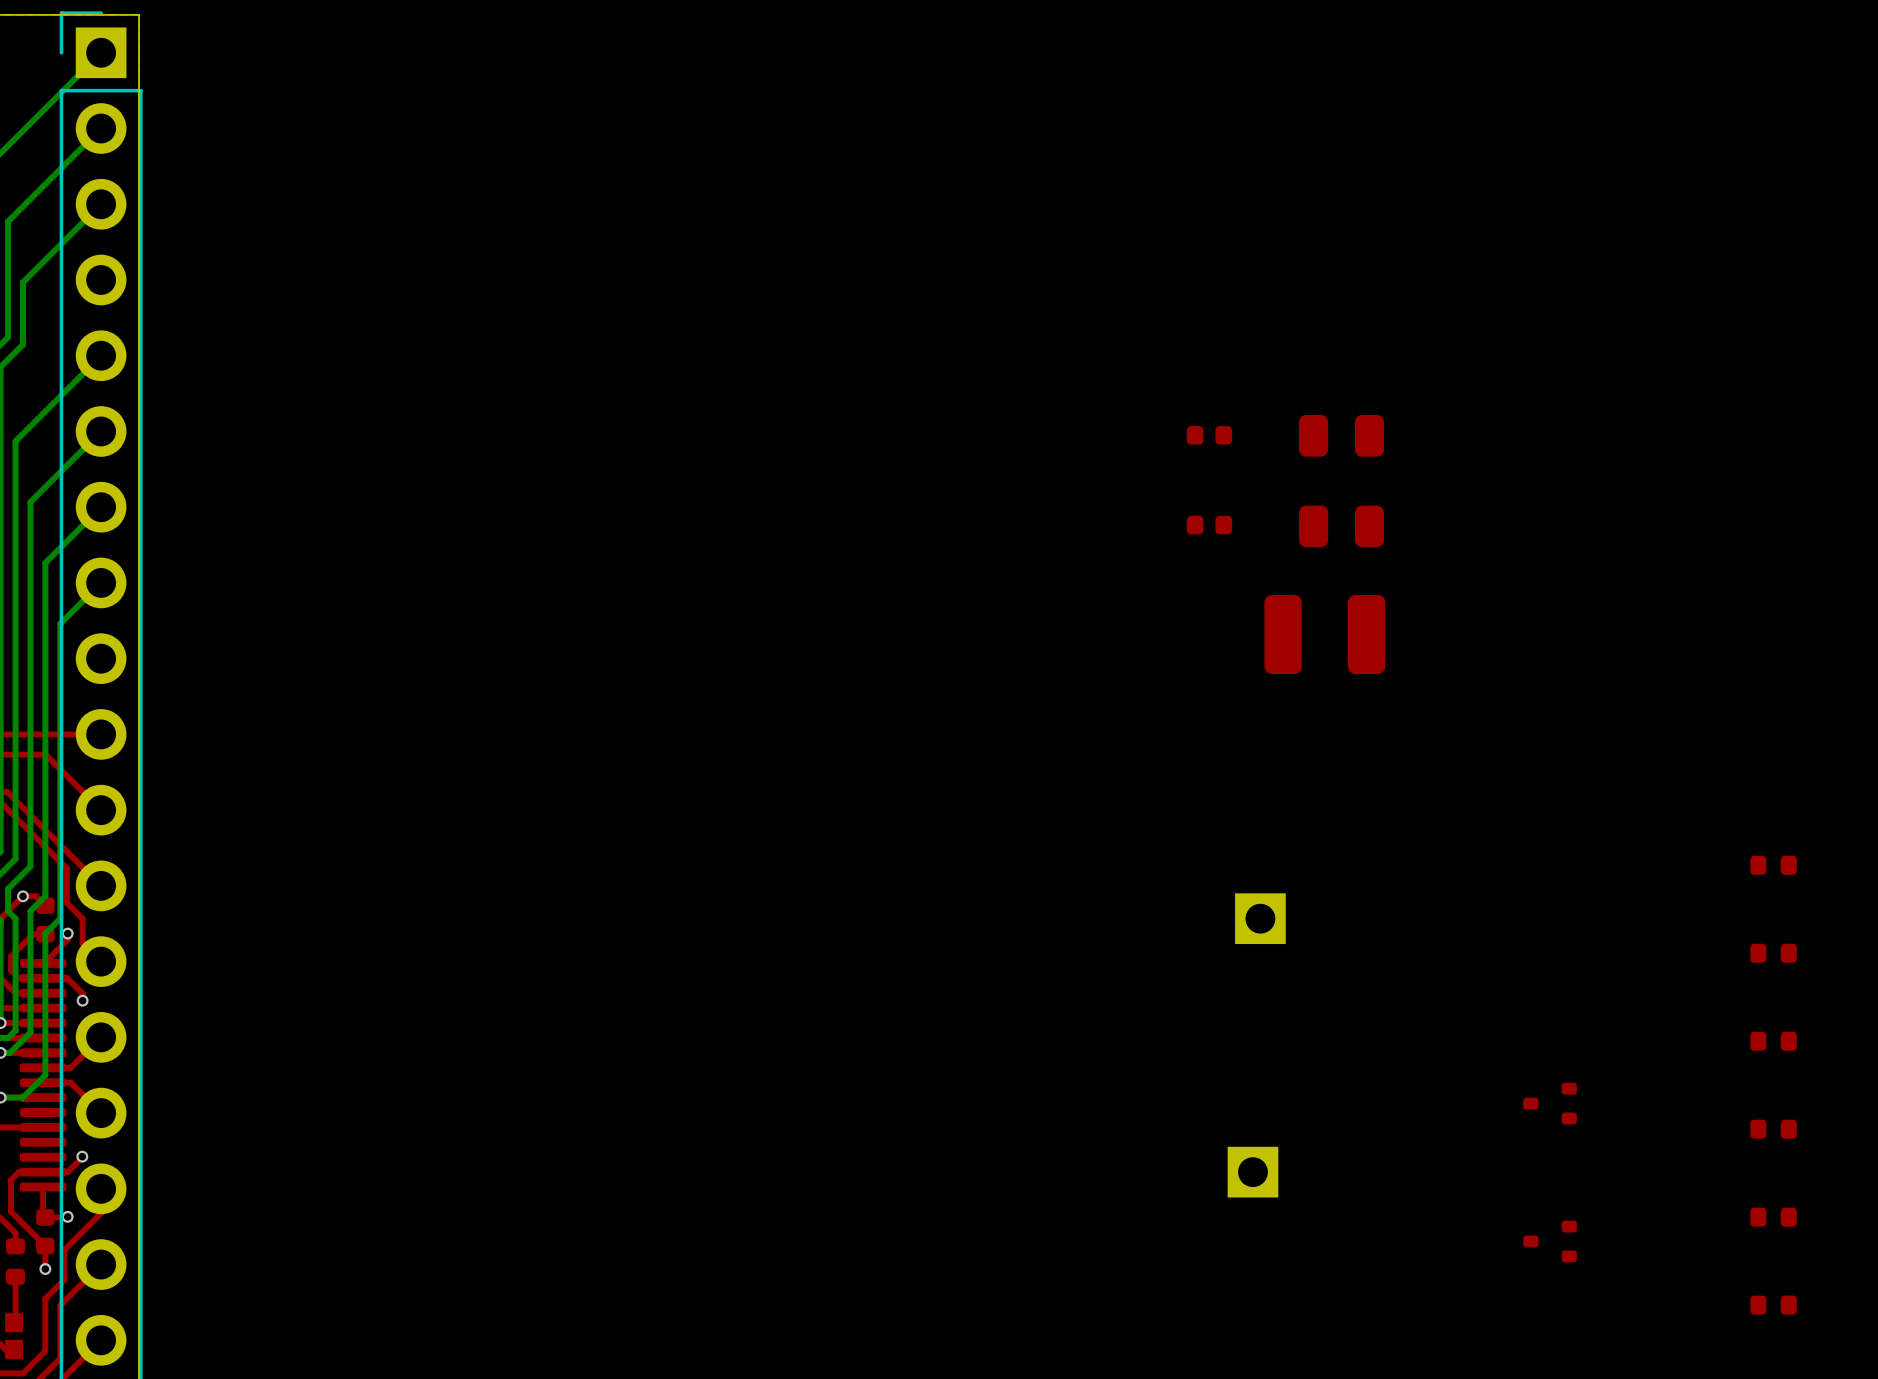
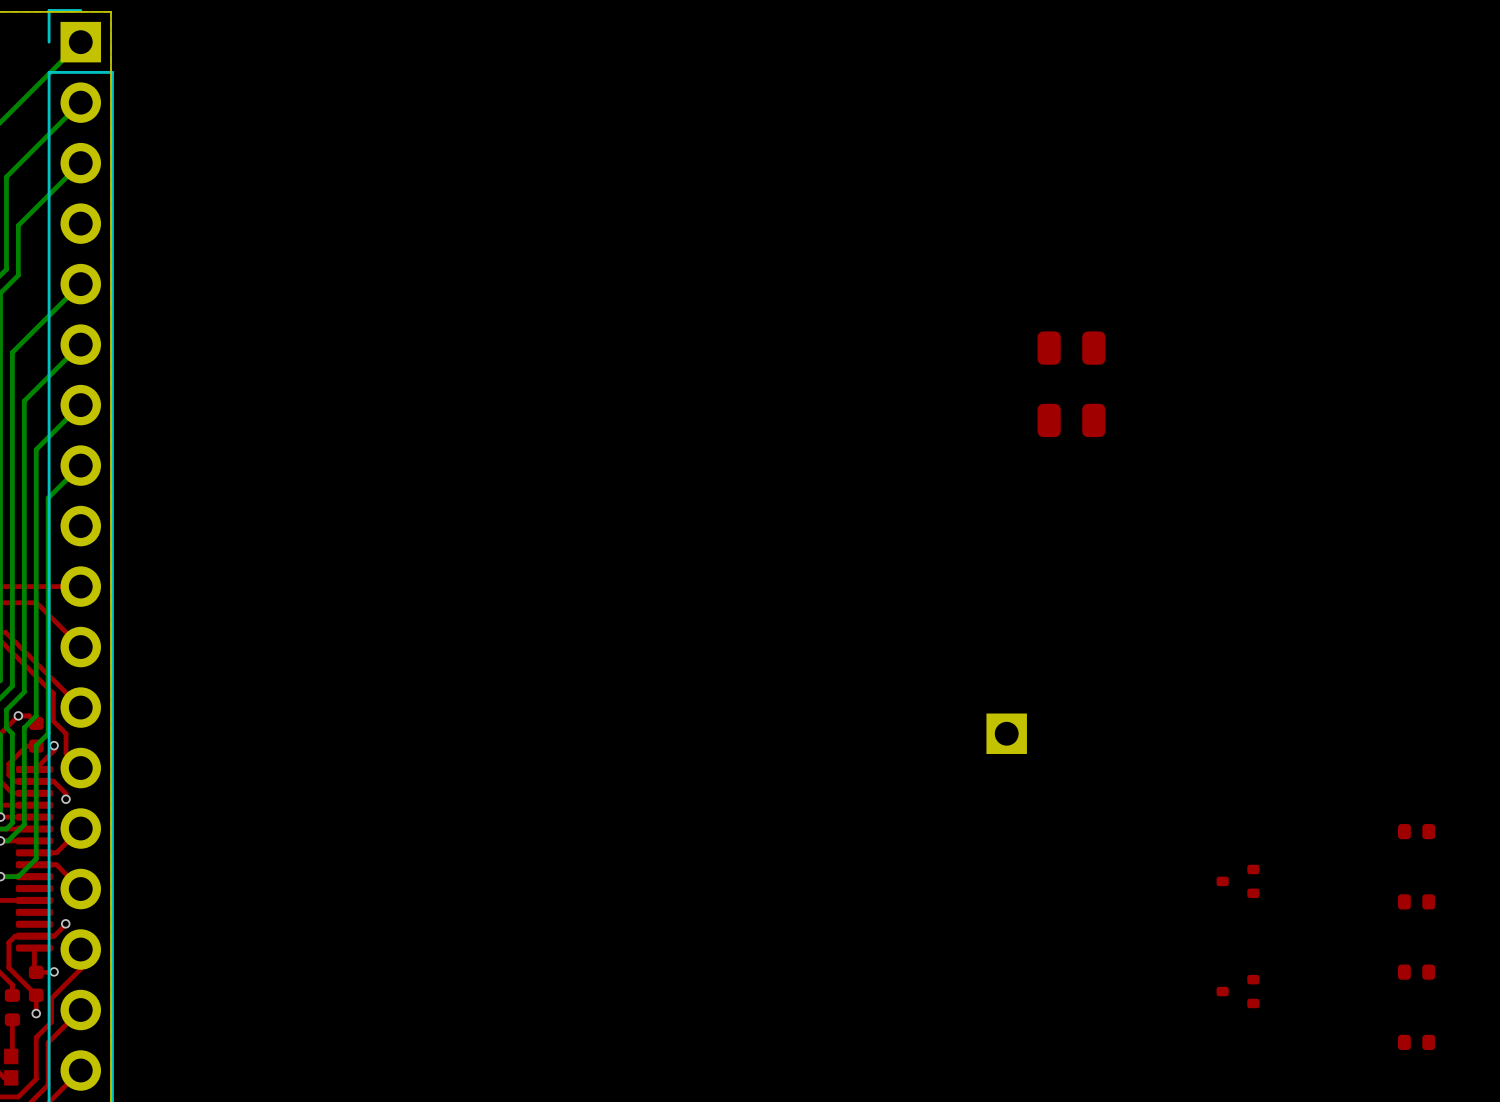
part: (1209, 435) -> none
part: (1209, 525) -> none
part: (1324, 634) -> none
part: (1773, 865) -> none
part: (1773, 953) -> none
part: (1252, 1172) -> none

